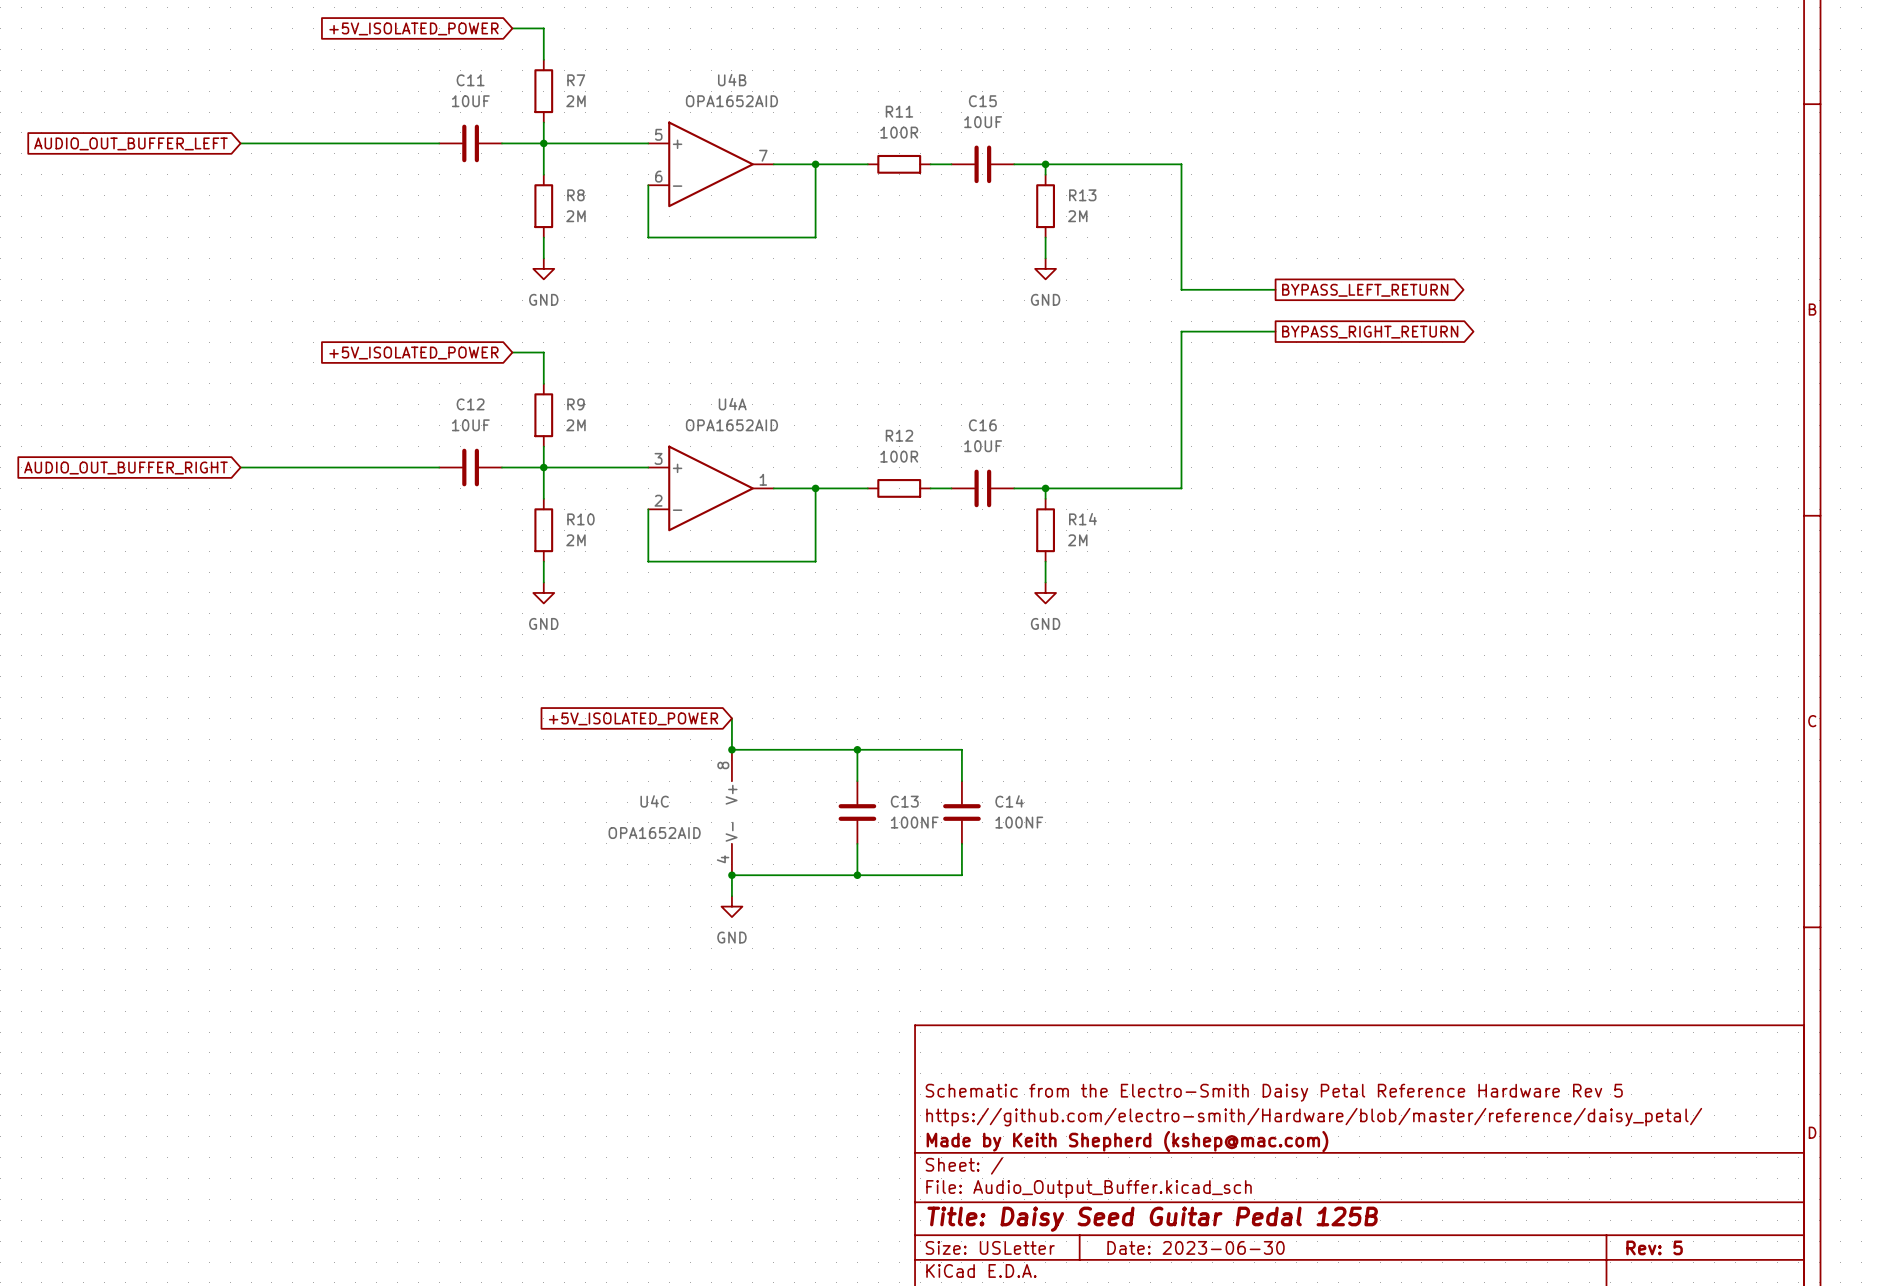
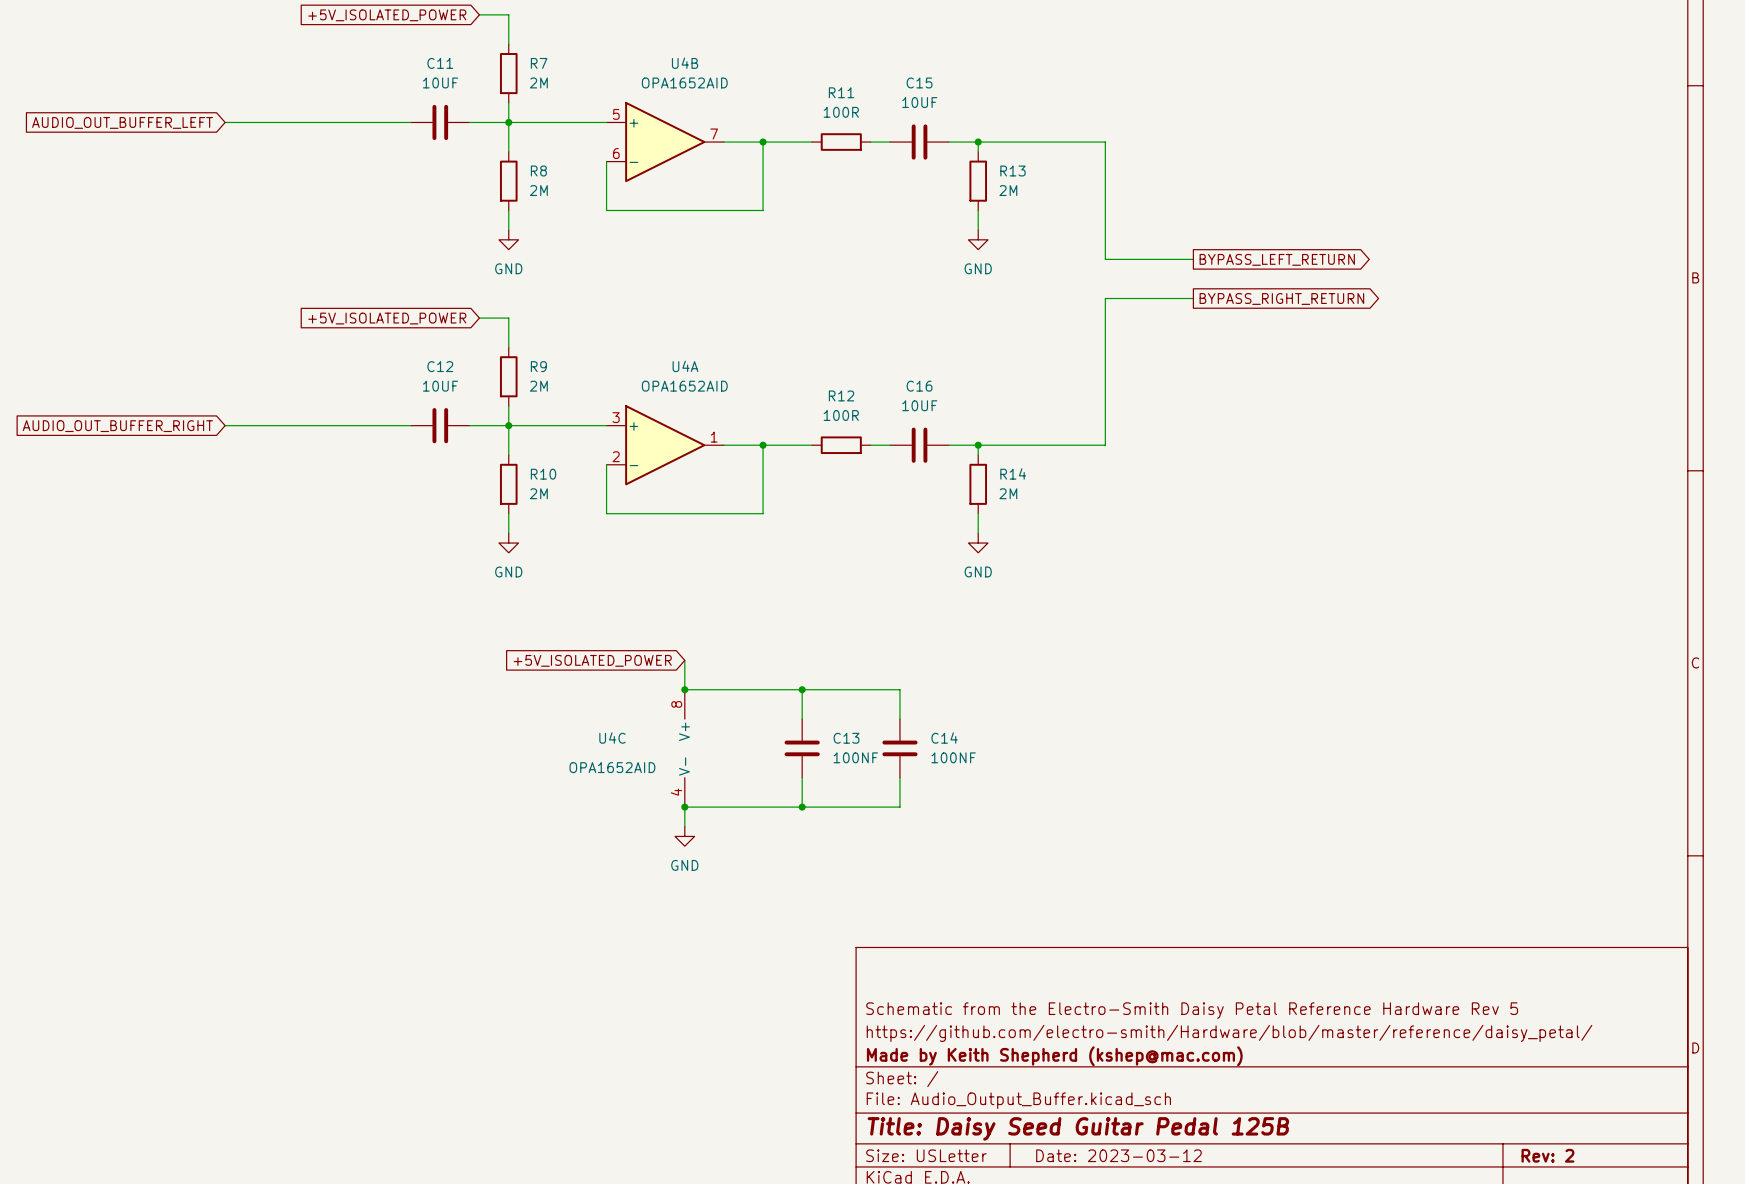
title block: Date: 2023-06-30 (1196, 1247) -> Date: 2023-03-12 (1118, 1155)
title block: Rev: 5 (1654, 1247) -> Rev: 2 (1547, 1155)

